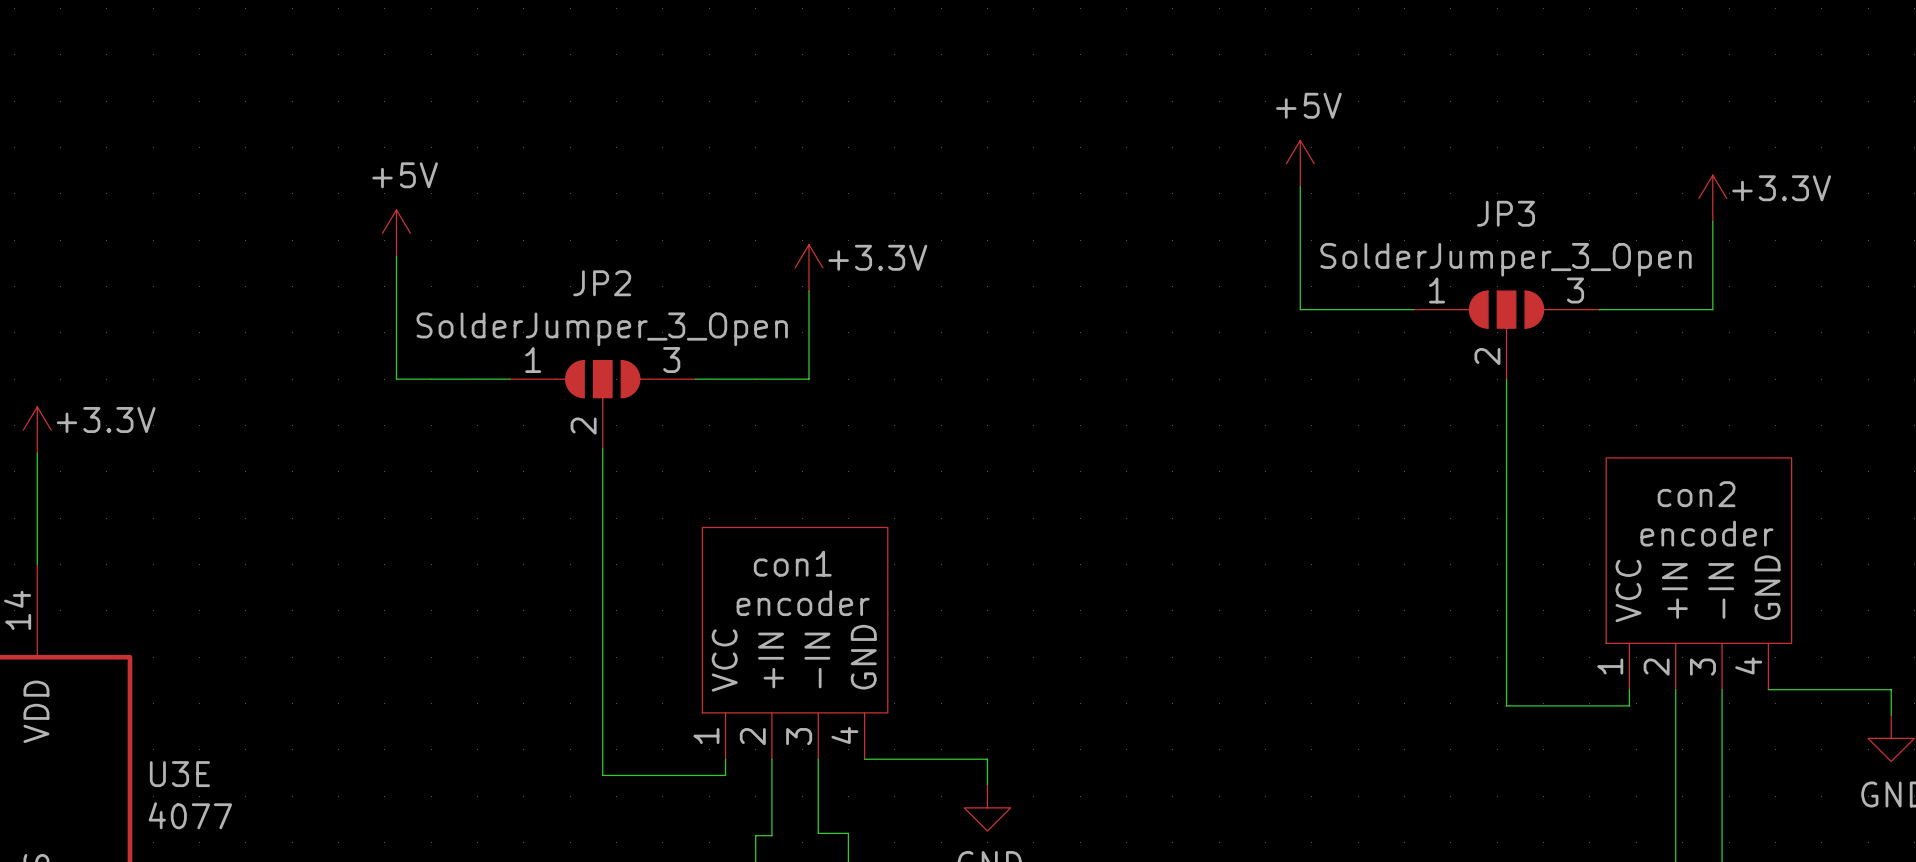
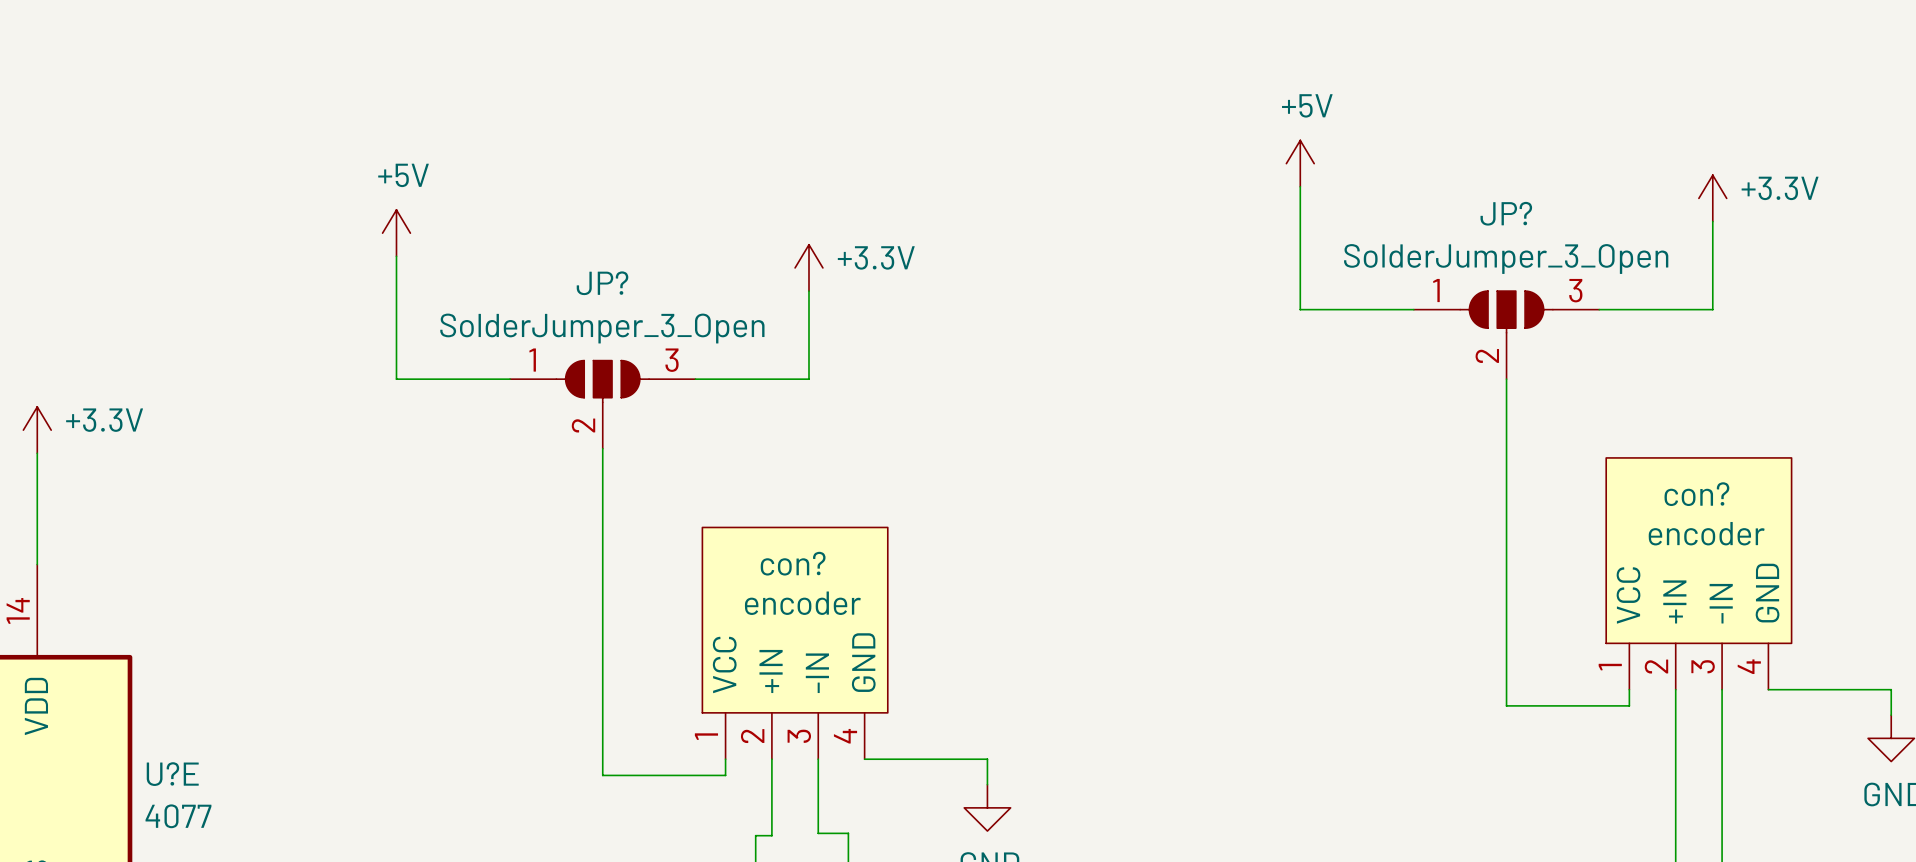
JP3 name: JP3 (1505, 213) -> JP? (1506, 213)
JP2 name: JP2 (602, 283) -> JP? (602, 283)
con2 name: con2 (1696, 494) -> con? (1696, 494)
con1 name: con1 (792, 563) -> con? (793, 563)
U3E name: U3E (179, 774) -> U?E (172, 774)

